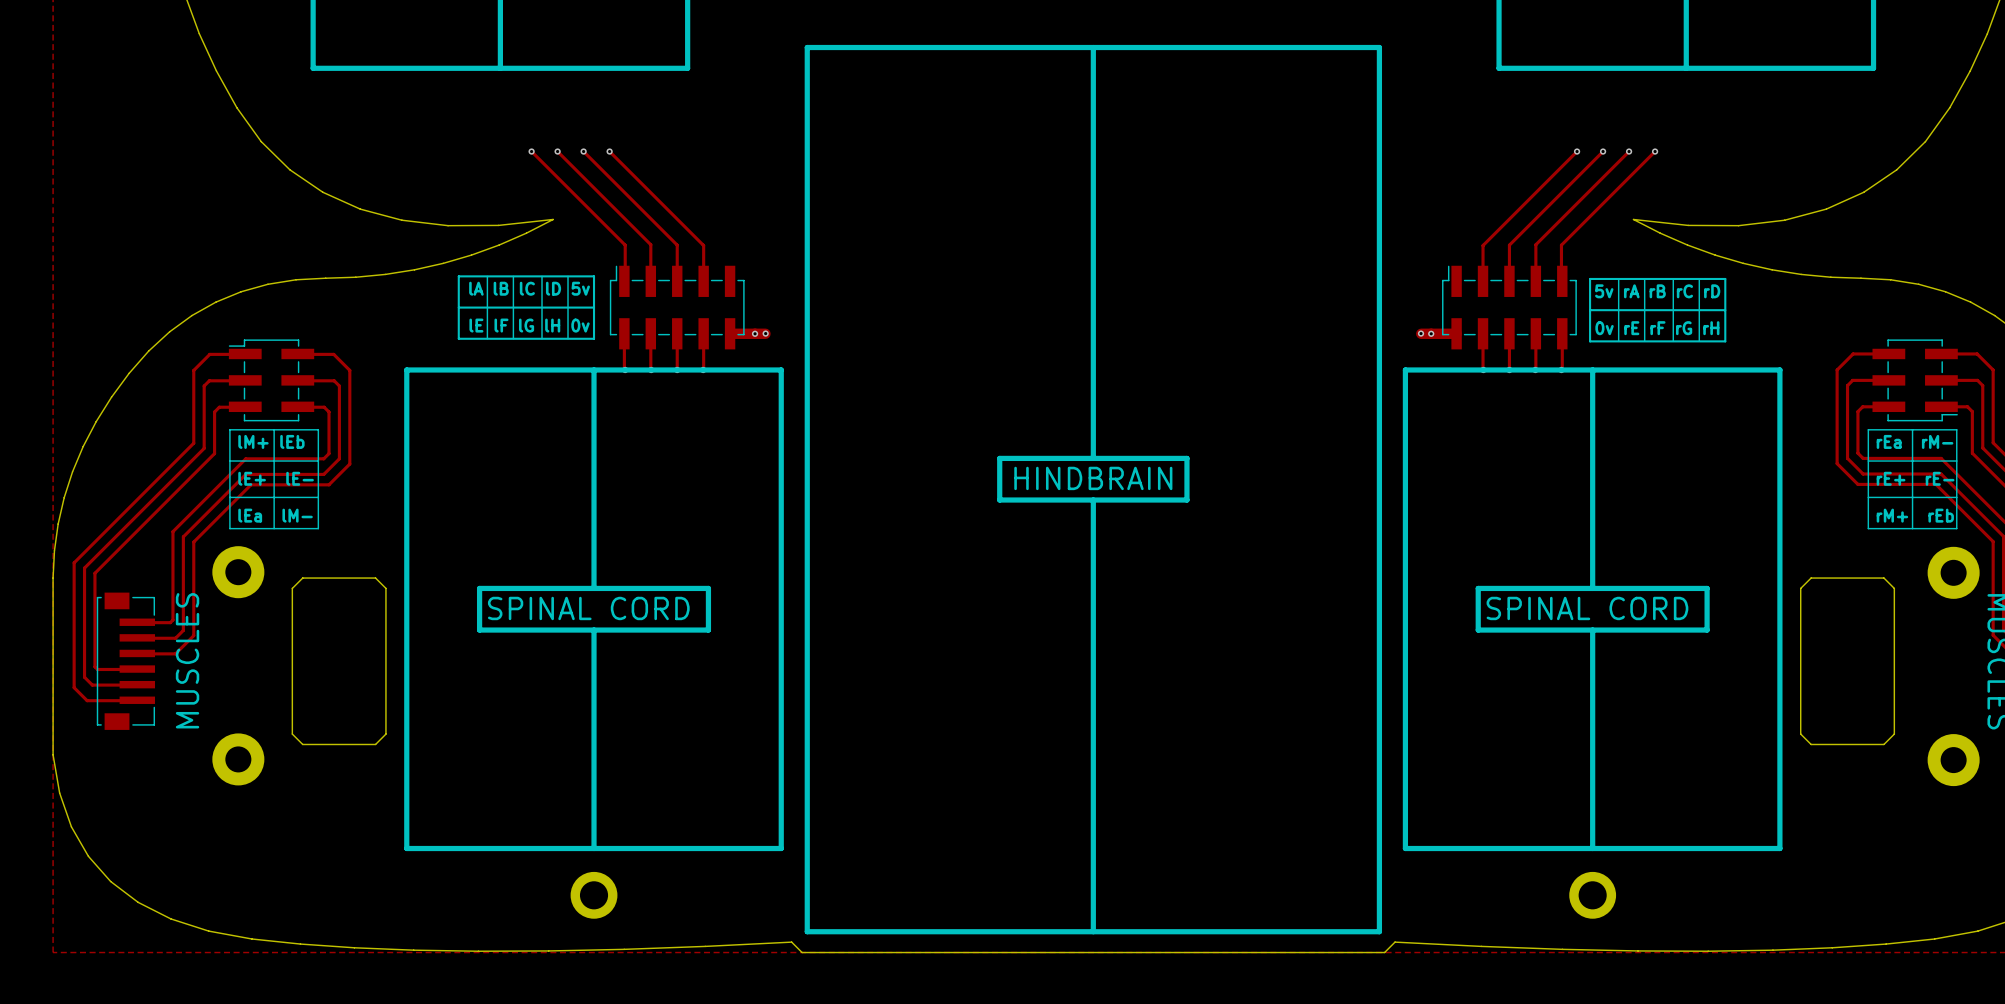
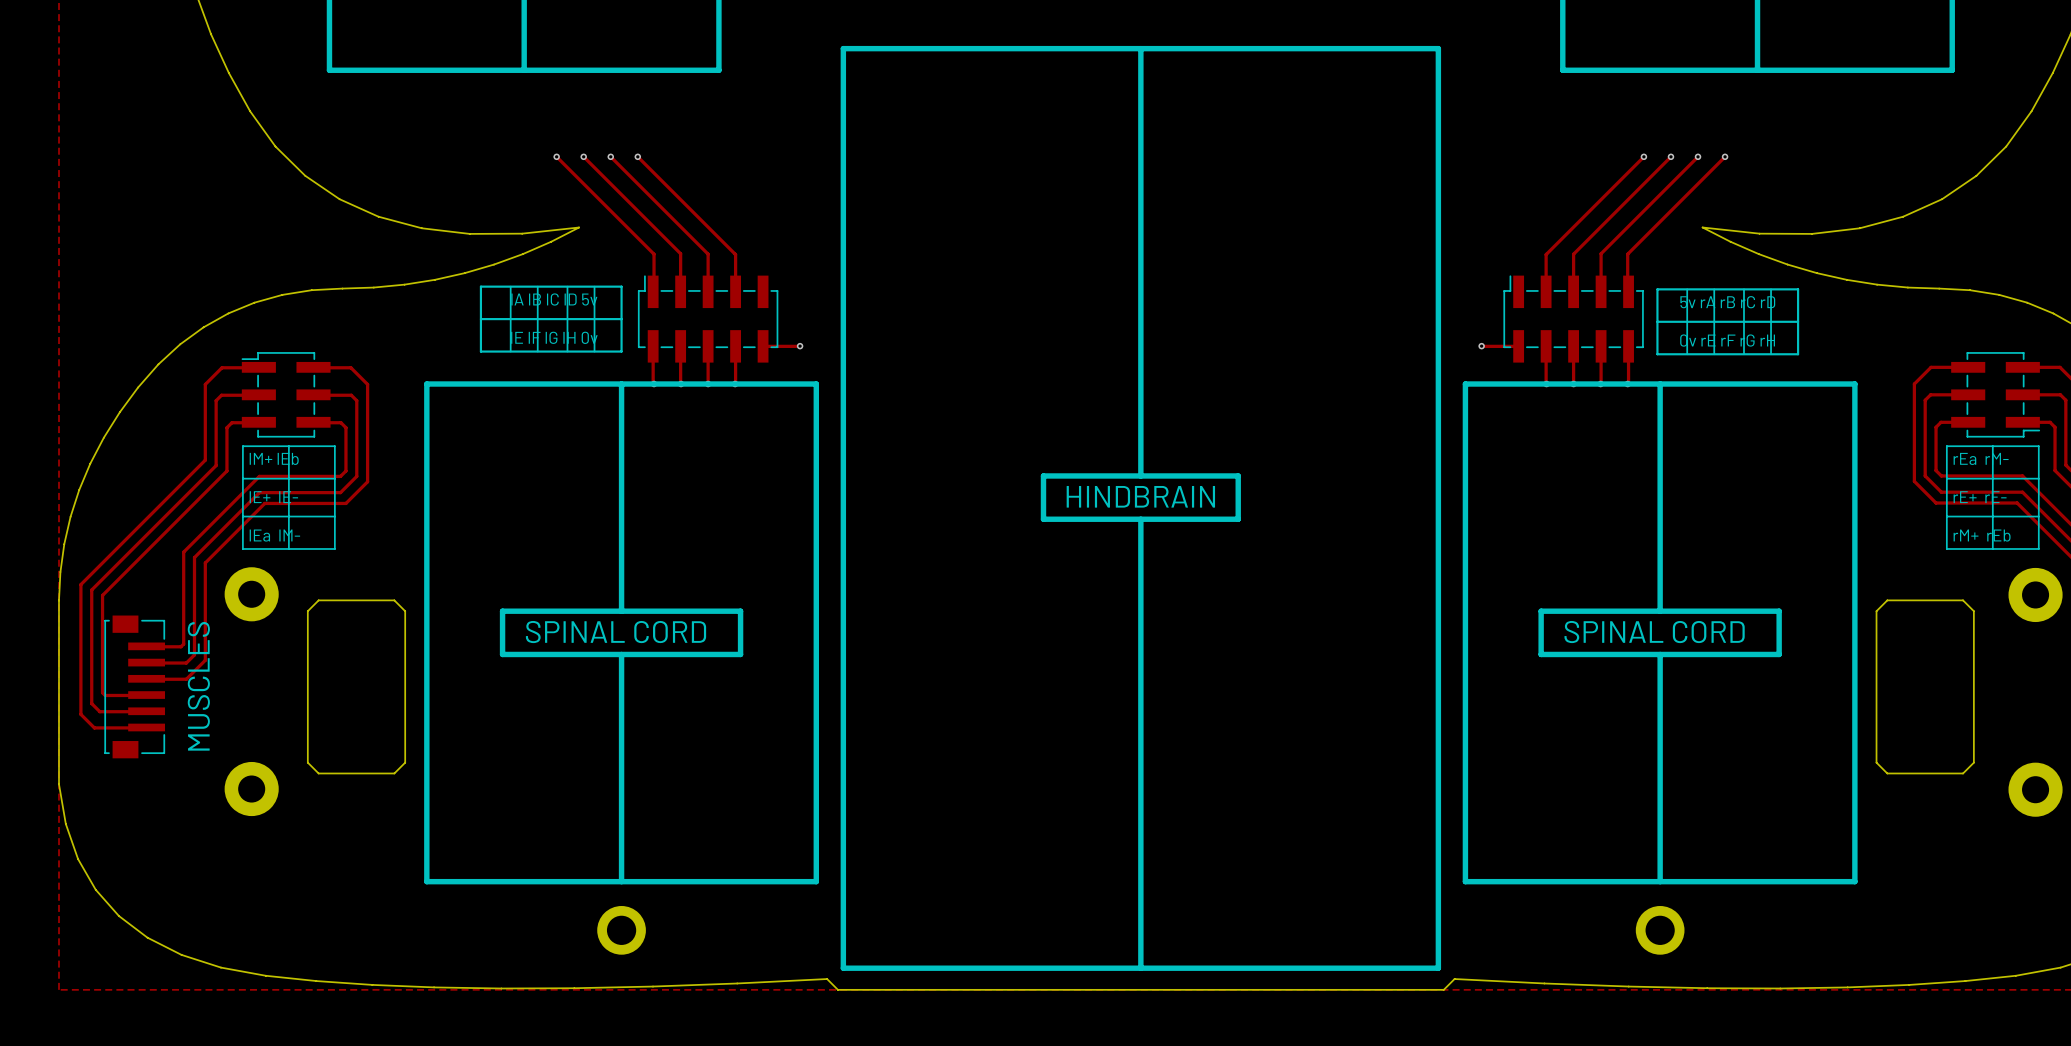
track width: thick (730, 333) (765, 333) -> thin (763, 346) (799, 346)
via: (755, 333) -> none
track width: thick (1421, 333) (1456, 333) -> thin (1481, 346) (1518, 346)
via: (1431, 333) -> none

